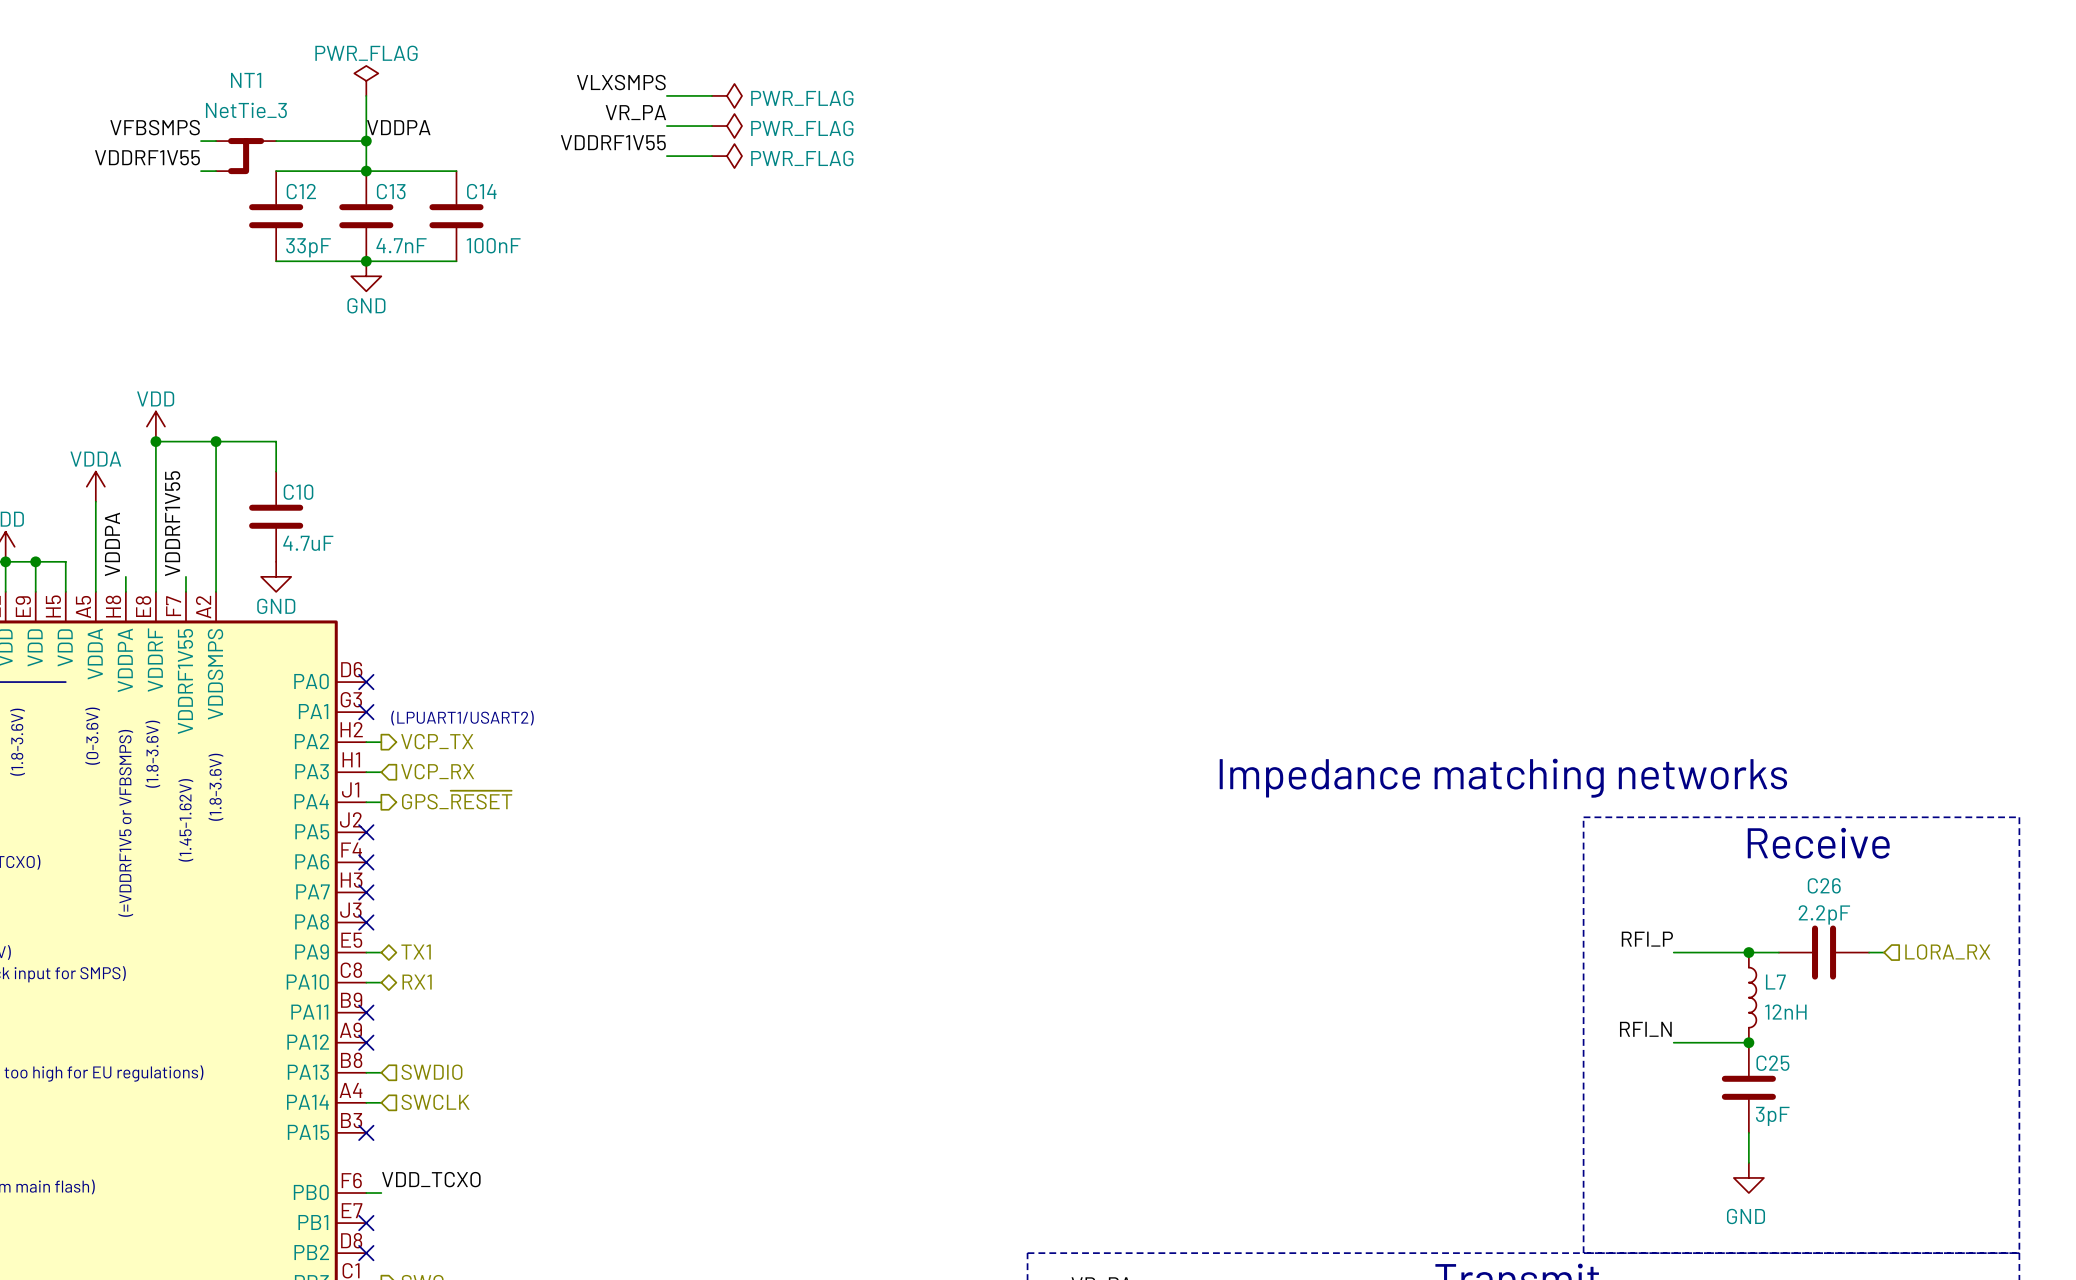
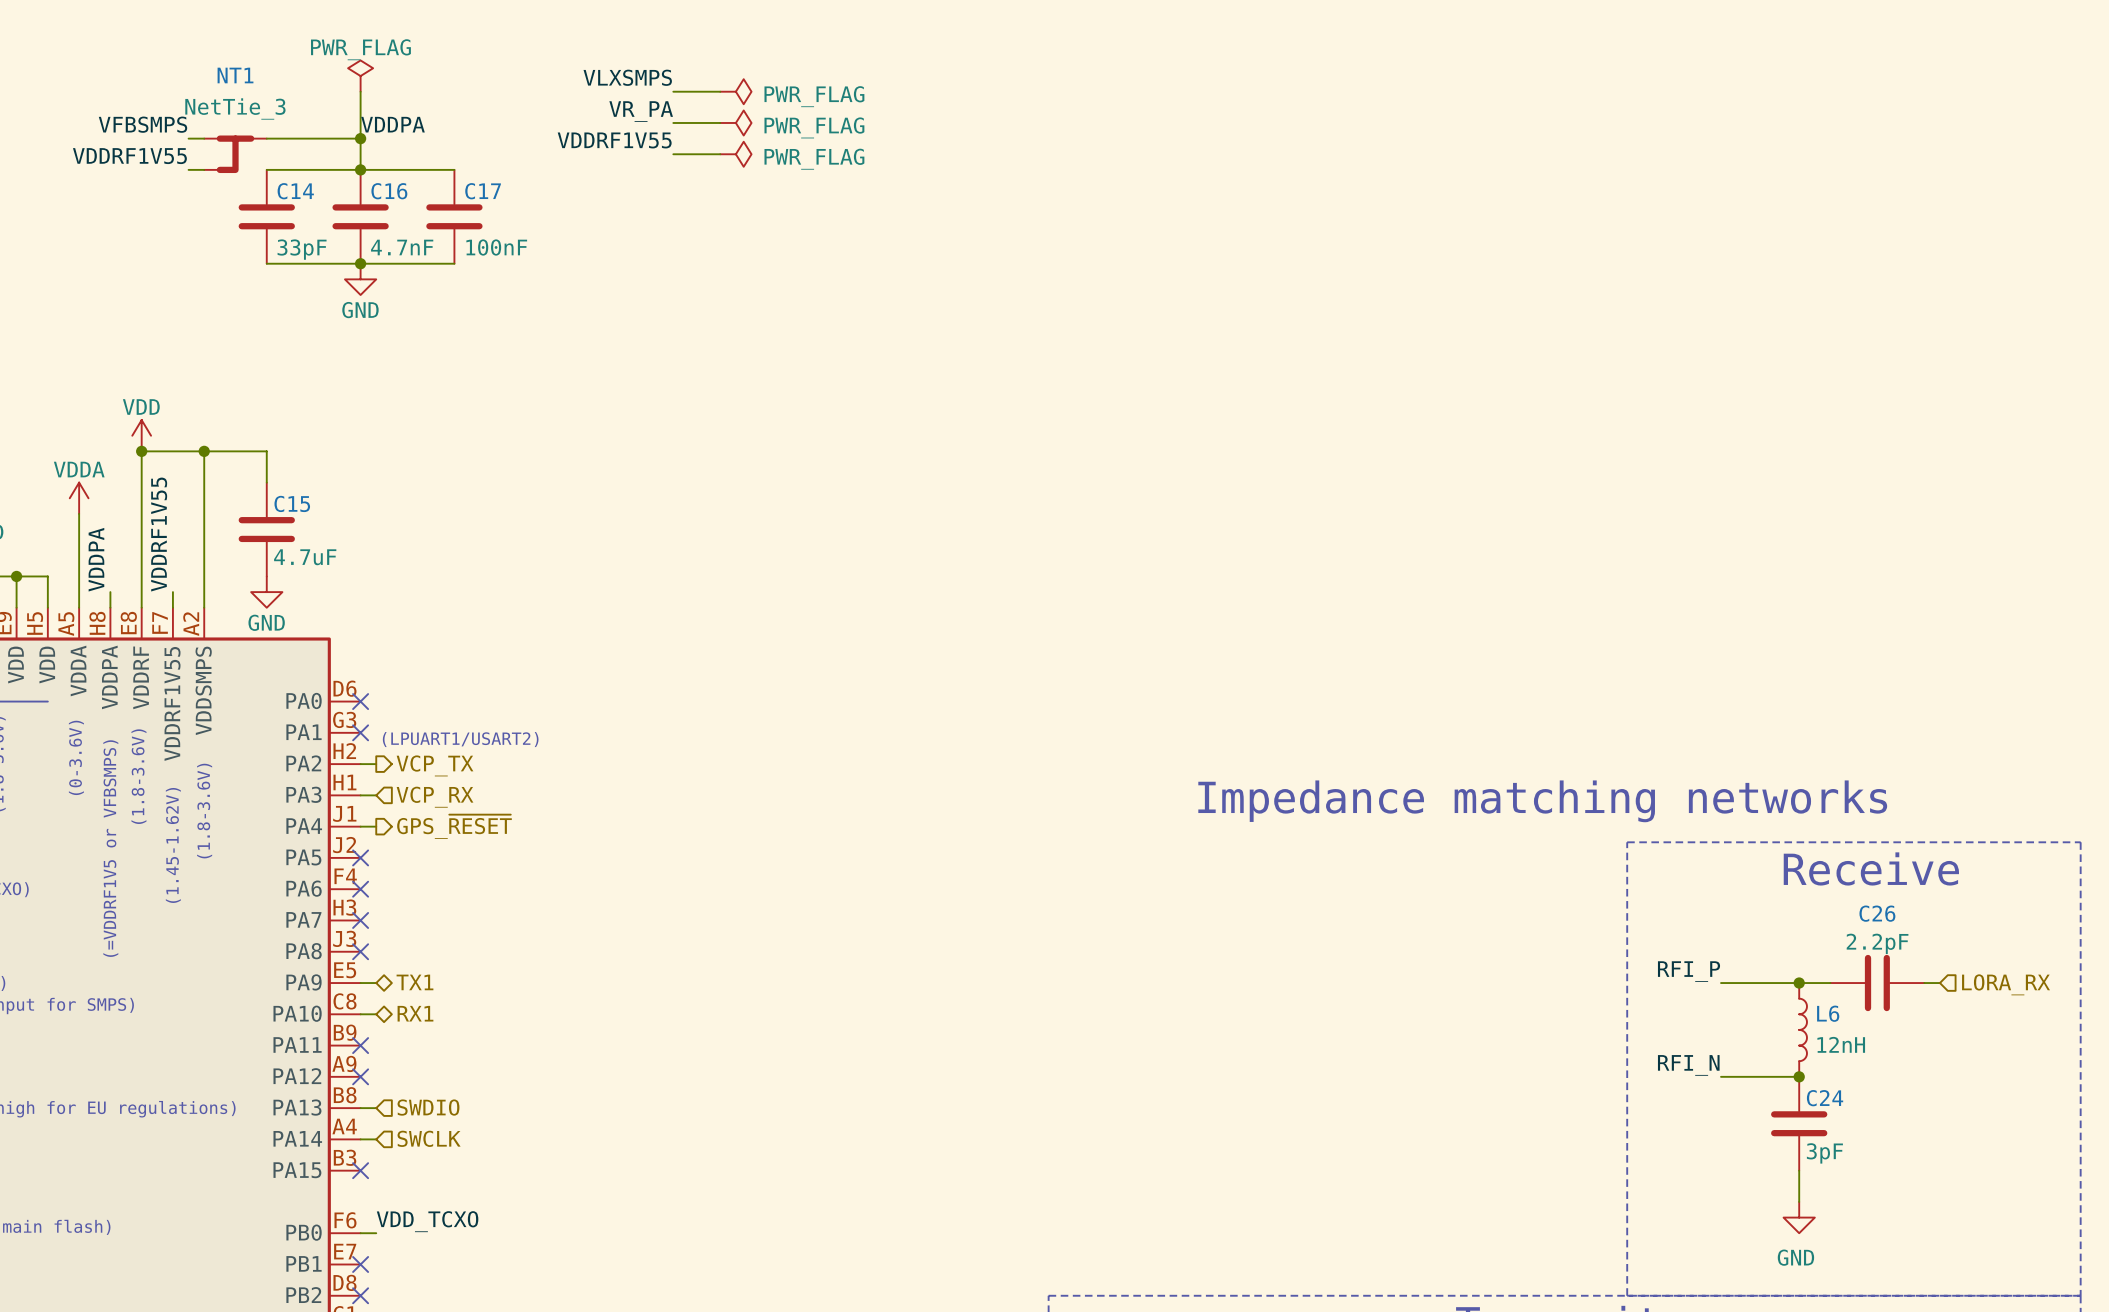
C12 name: C12 (301, 191) -> C14 (295, 191)
C13 name: C13 (391, 191) -> C16 (389, 191)
C14 name: C14 (481, 191) -> C17 (483, 191)
C10 name: C10 (298, 492) -> C15 (292, 503)
L7 name: L7 (1775, 982) -> L6 (1828, 1013)
C25 name: C25 (1772, 1063) -> C24 (1825, 1098)

